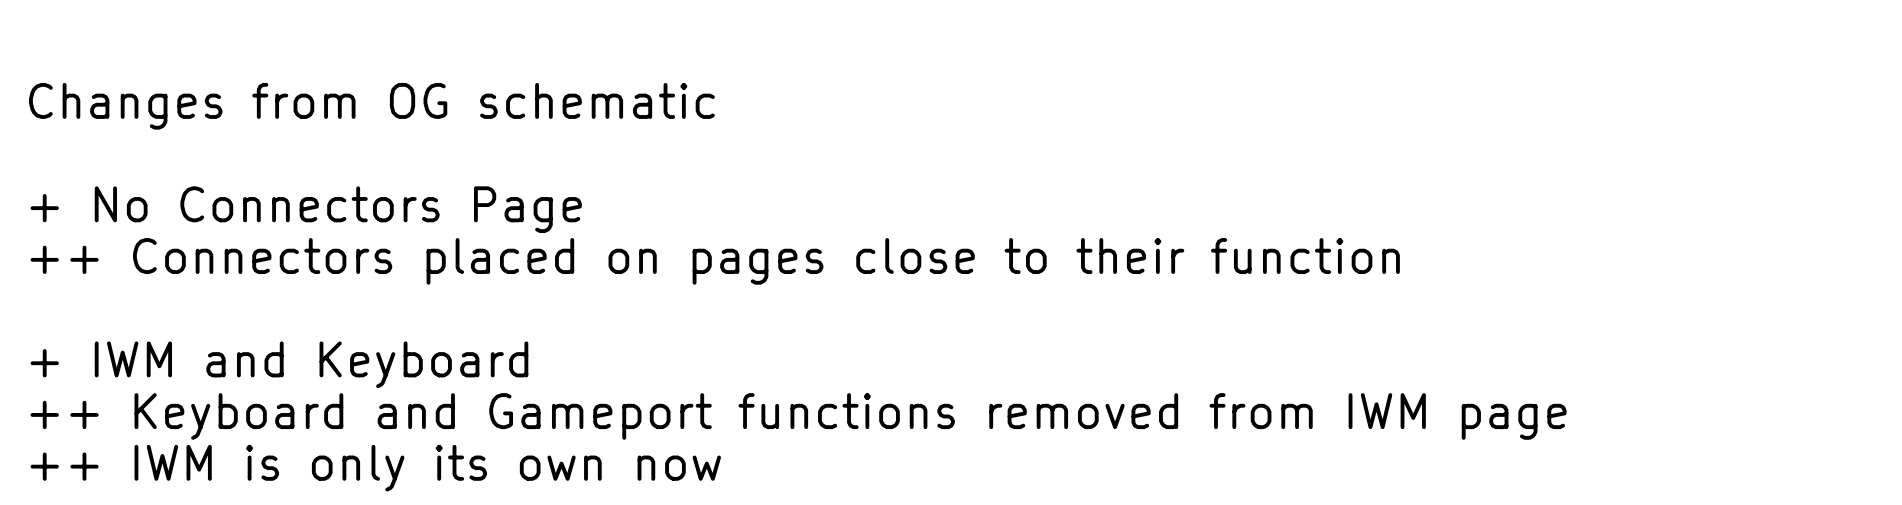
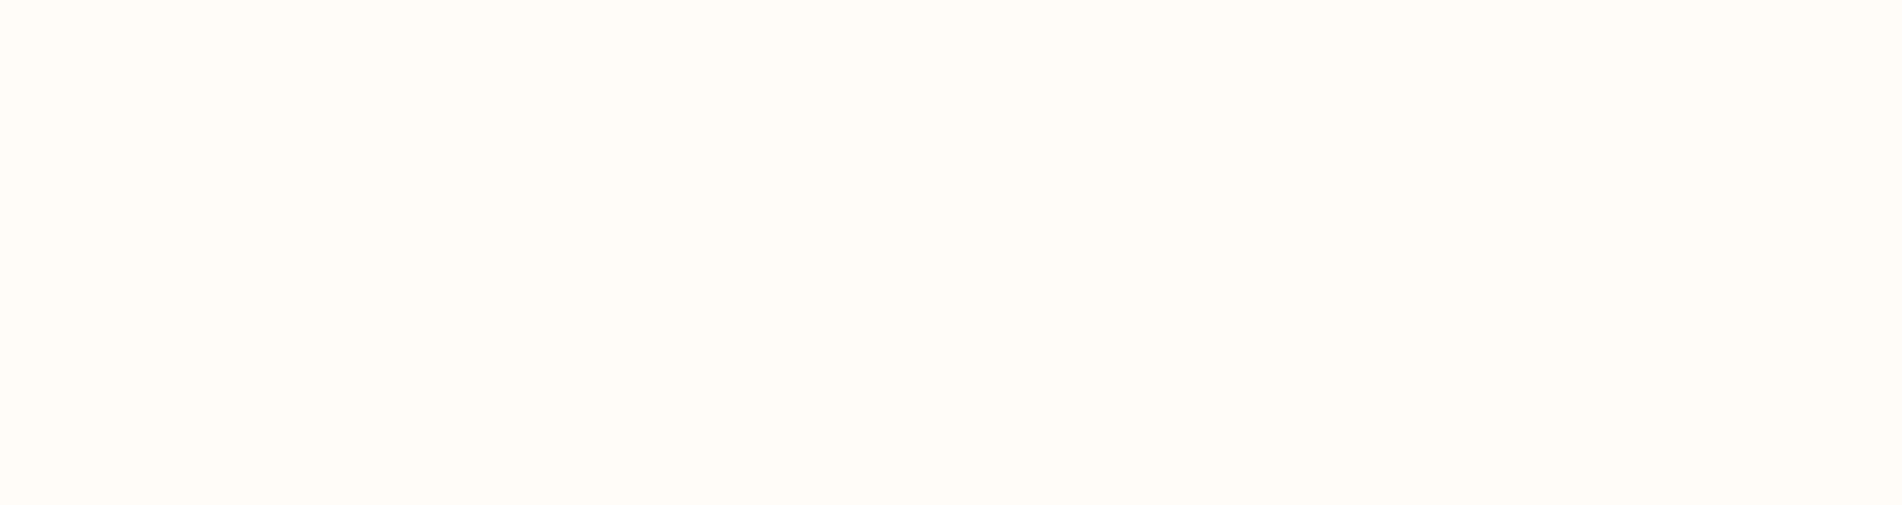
text: Changes from OG schematic (371, 106) -> none
text: + No Connectors Page (306, 209) -> none
text: ++ Connectors placed on pages close to their function (715, 261) -> none
text: + IWM and Keyboard (279, 364) -> none
text: ++ Keyboard and Gameport functions removed from IWM page (798, 416) -> none
text: ++ IWM is only its own now (375, 468) -> none

